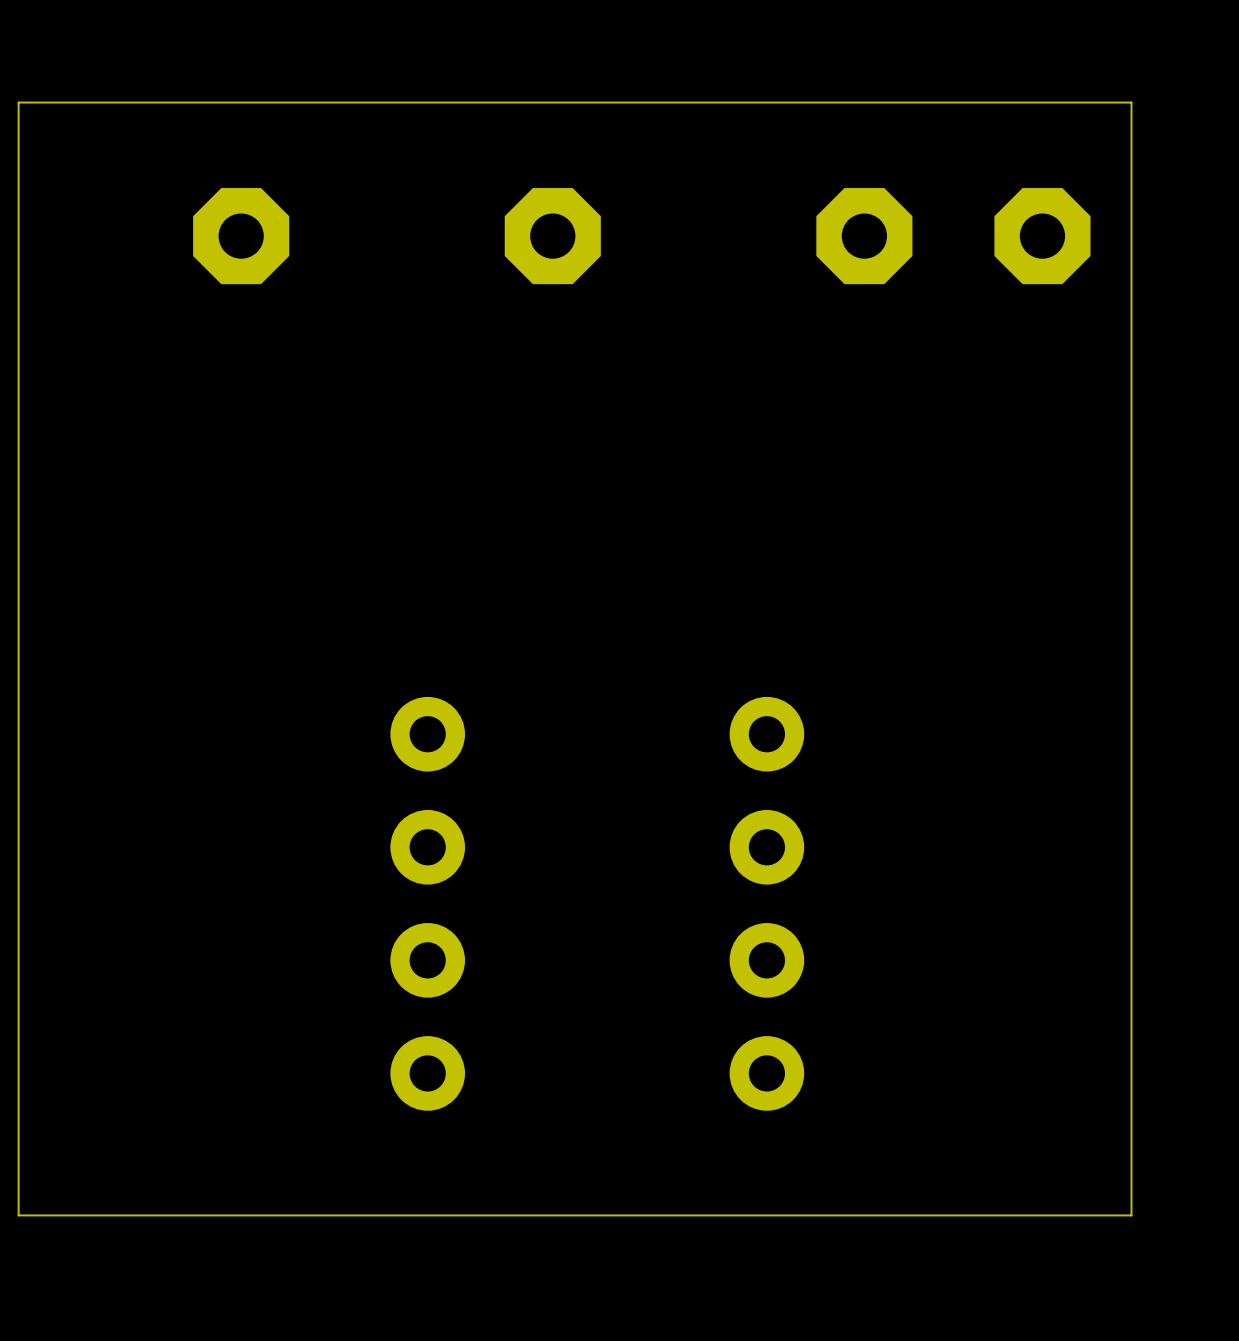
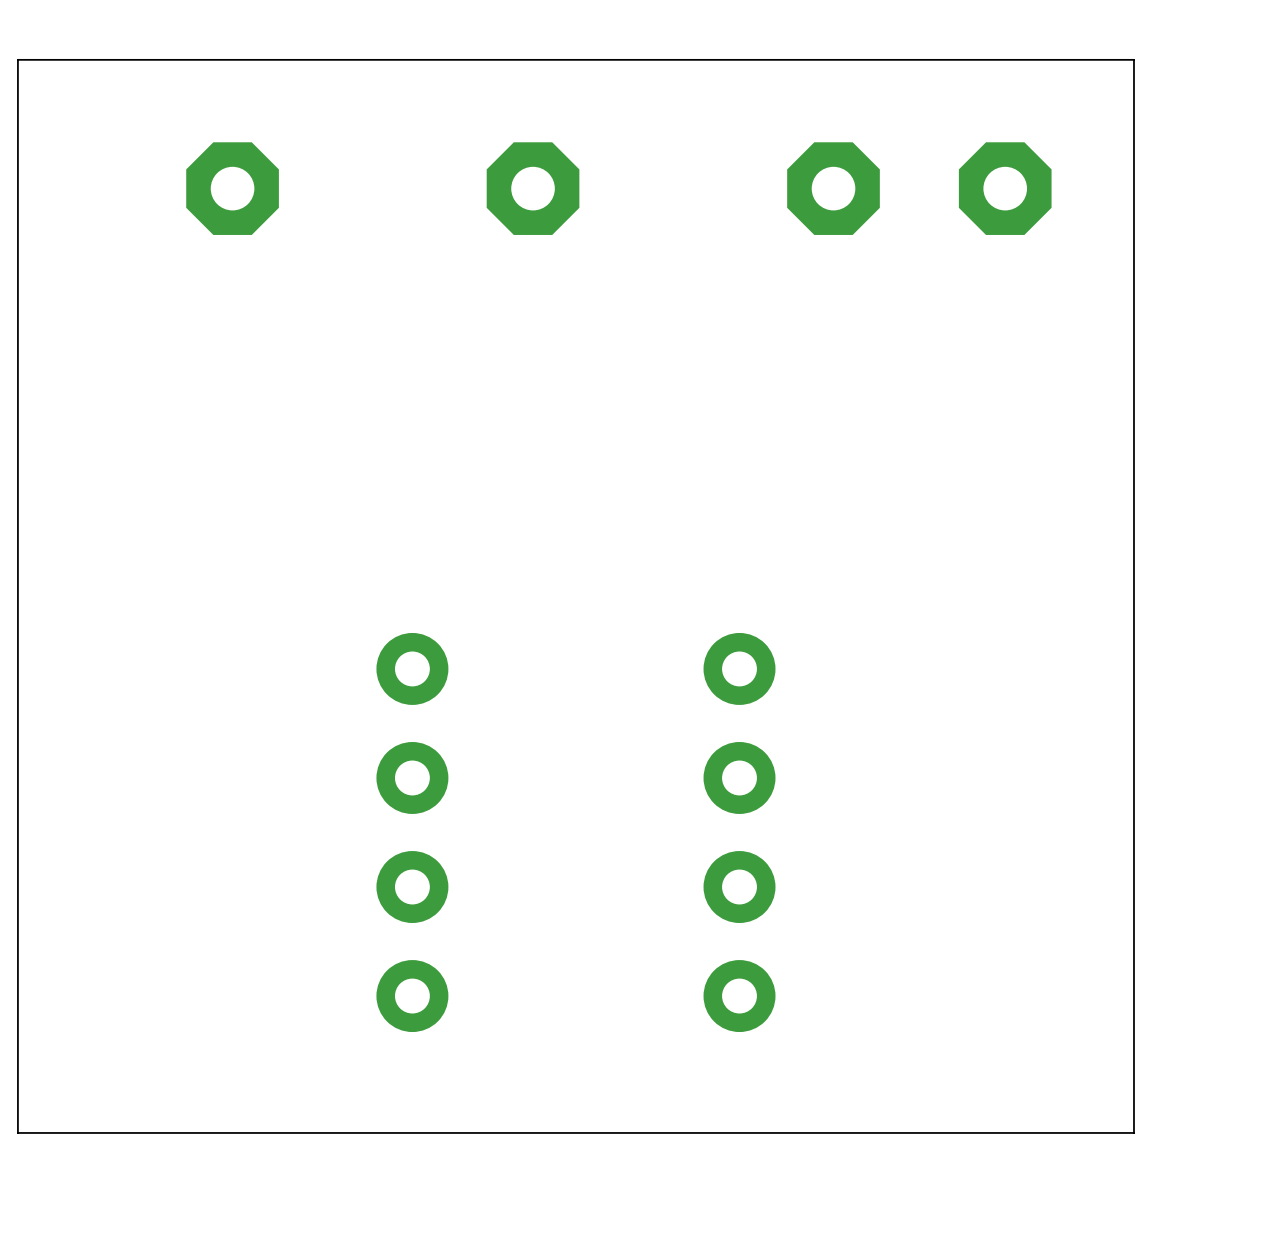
board edge: (1131, 102) (1131, 1215) -> (1091, 59) (1133, 59) (1133, 1132) (1091, 1132)

